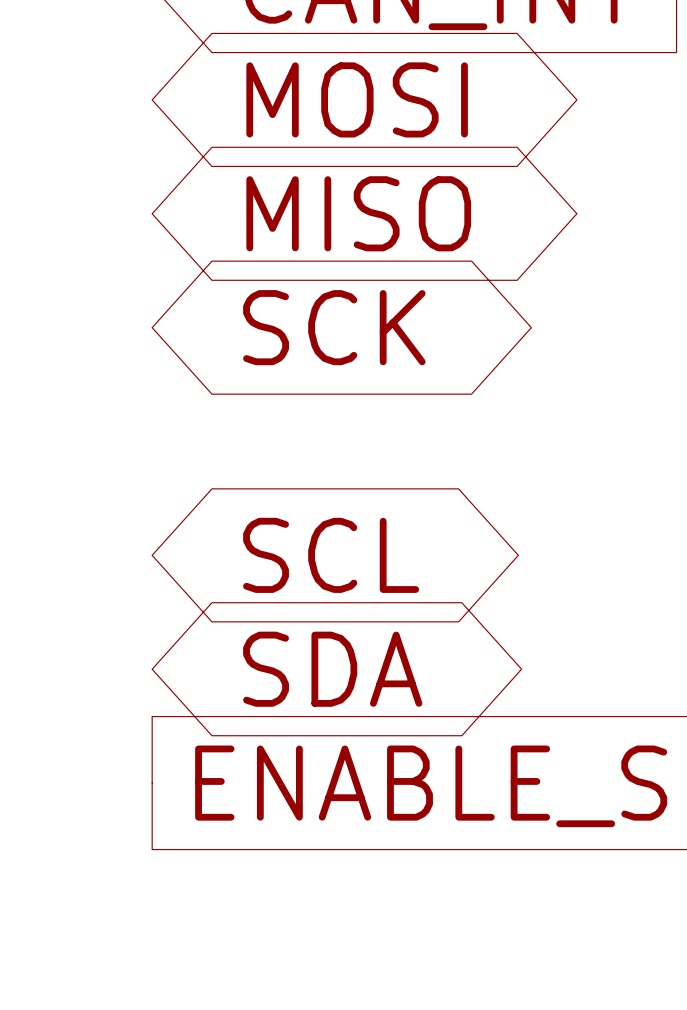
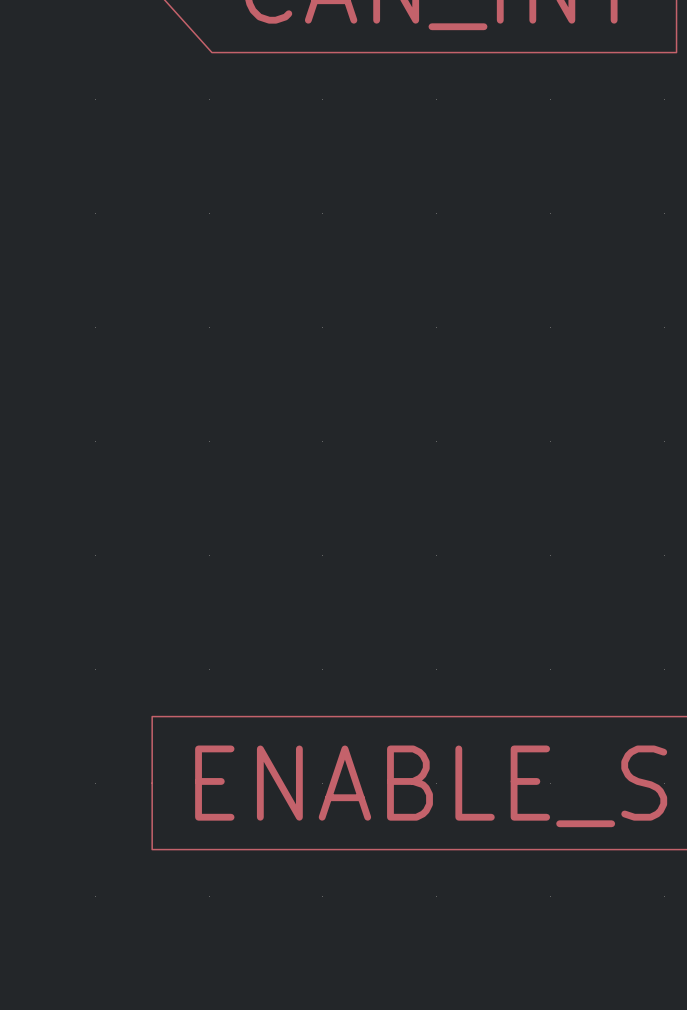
global label: MOSI (357, 99) -> none
global label: MISO (358, 213) -> none
global label: SCK (334, 327) -> none
global label: SCL (331, 555) -> none
global label: SDA (332, 669) -> none

